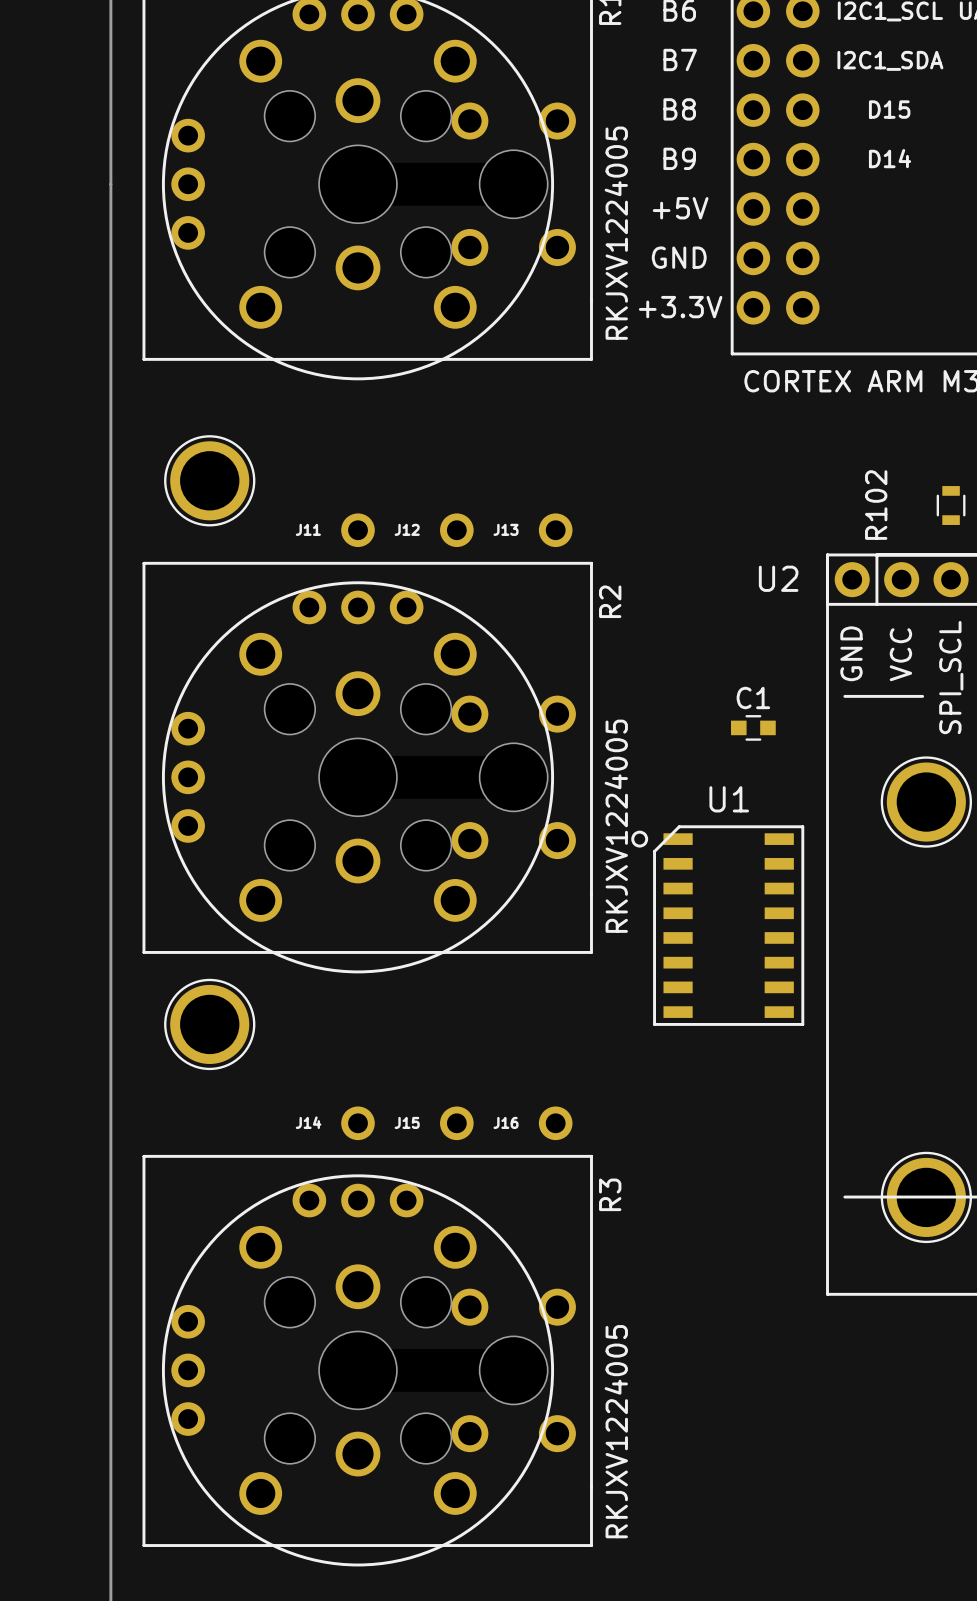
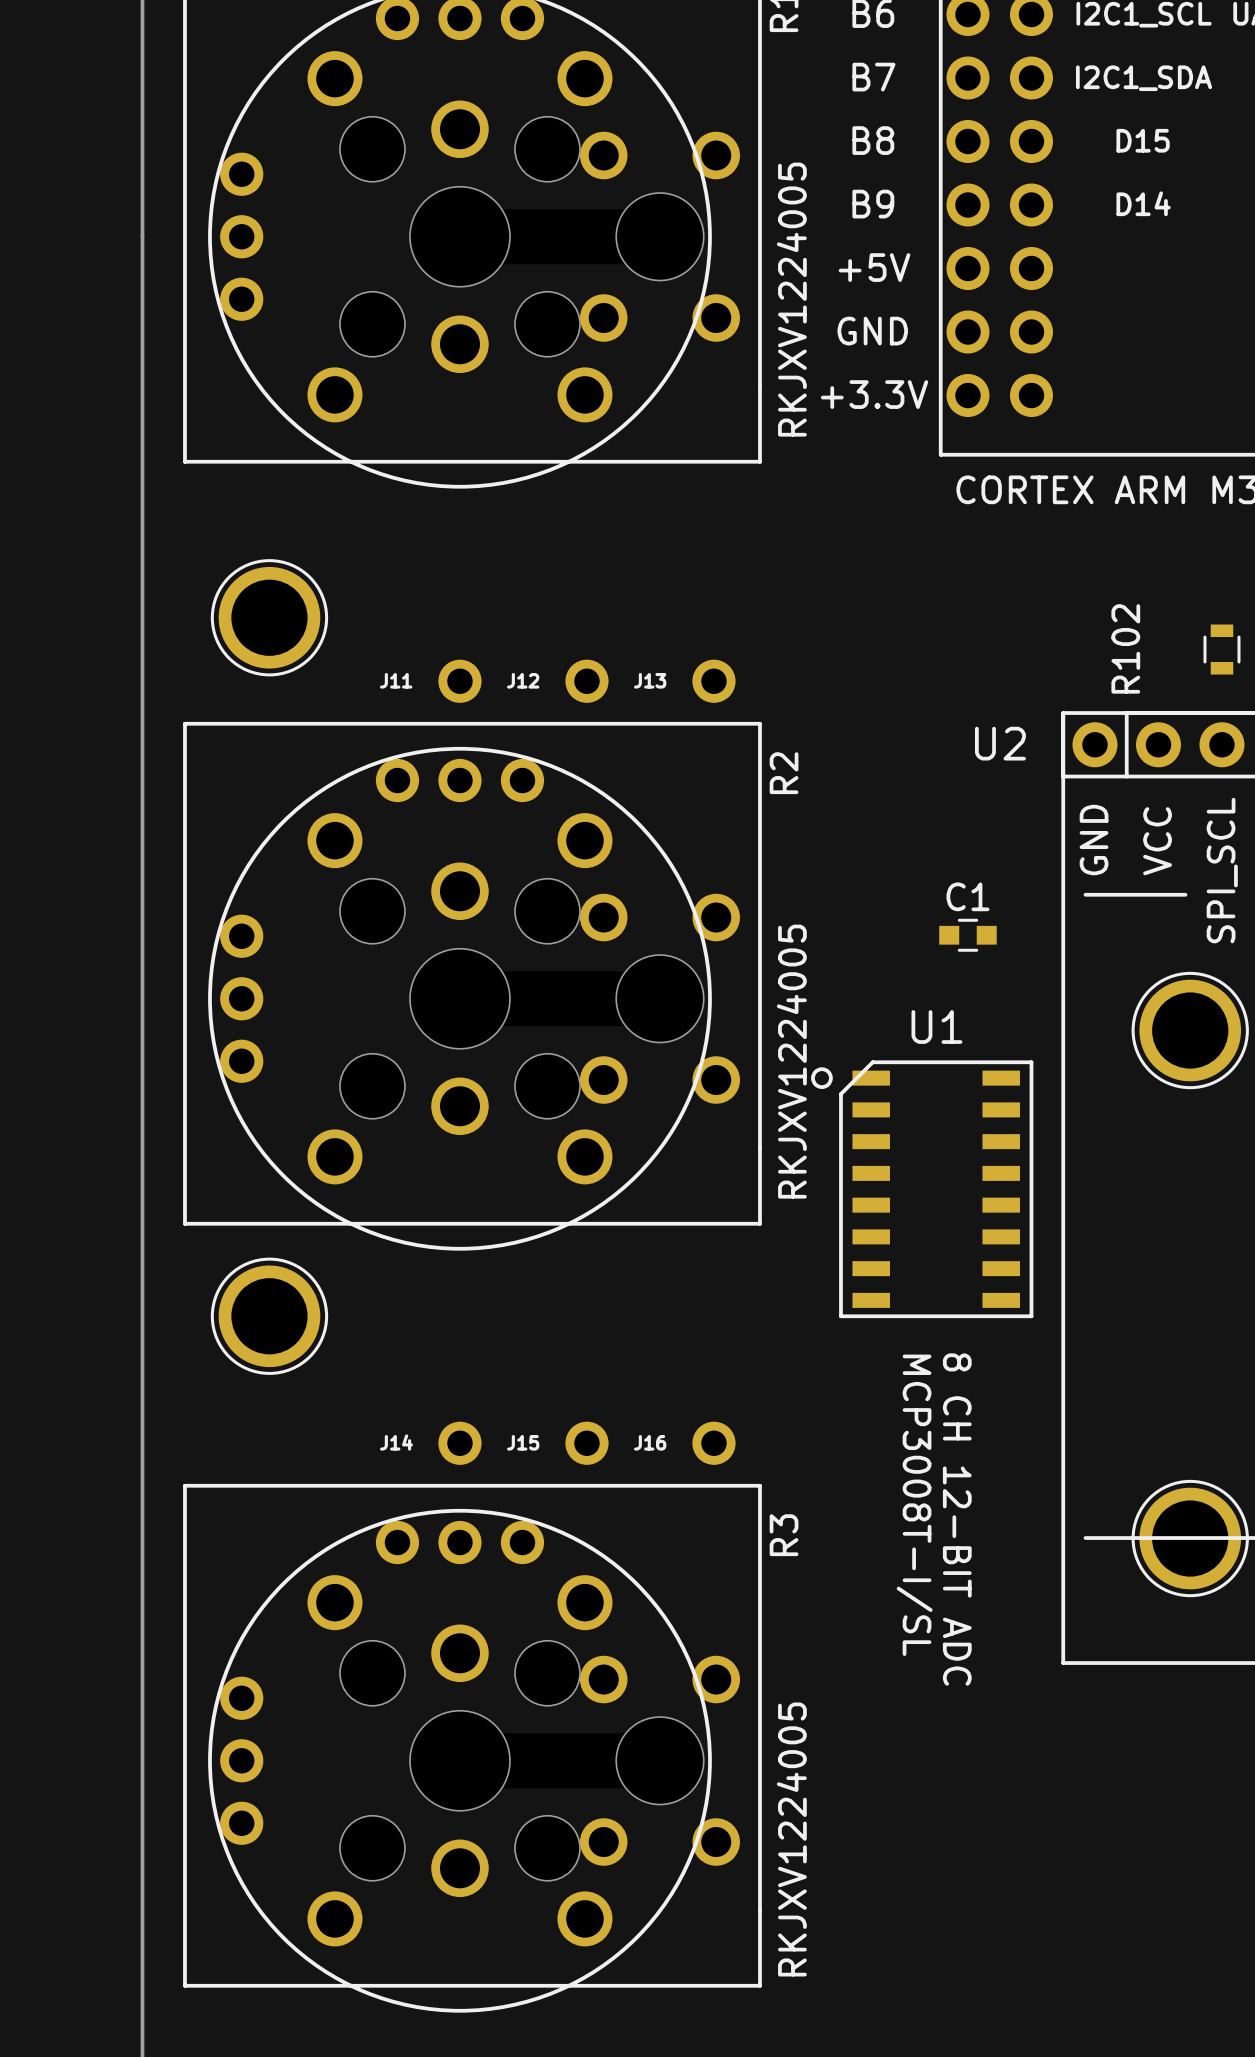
text: none -> MCP3008T-I/SL (914, 1505)
text: none -> 8 CH 12-BIT ADC (957, 1519)

